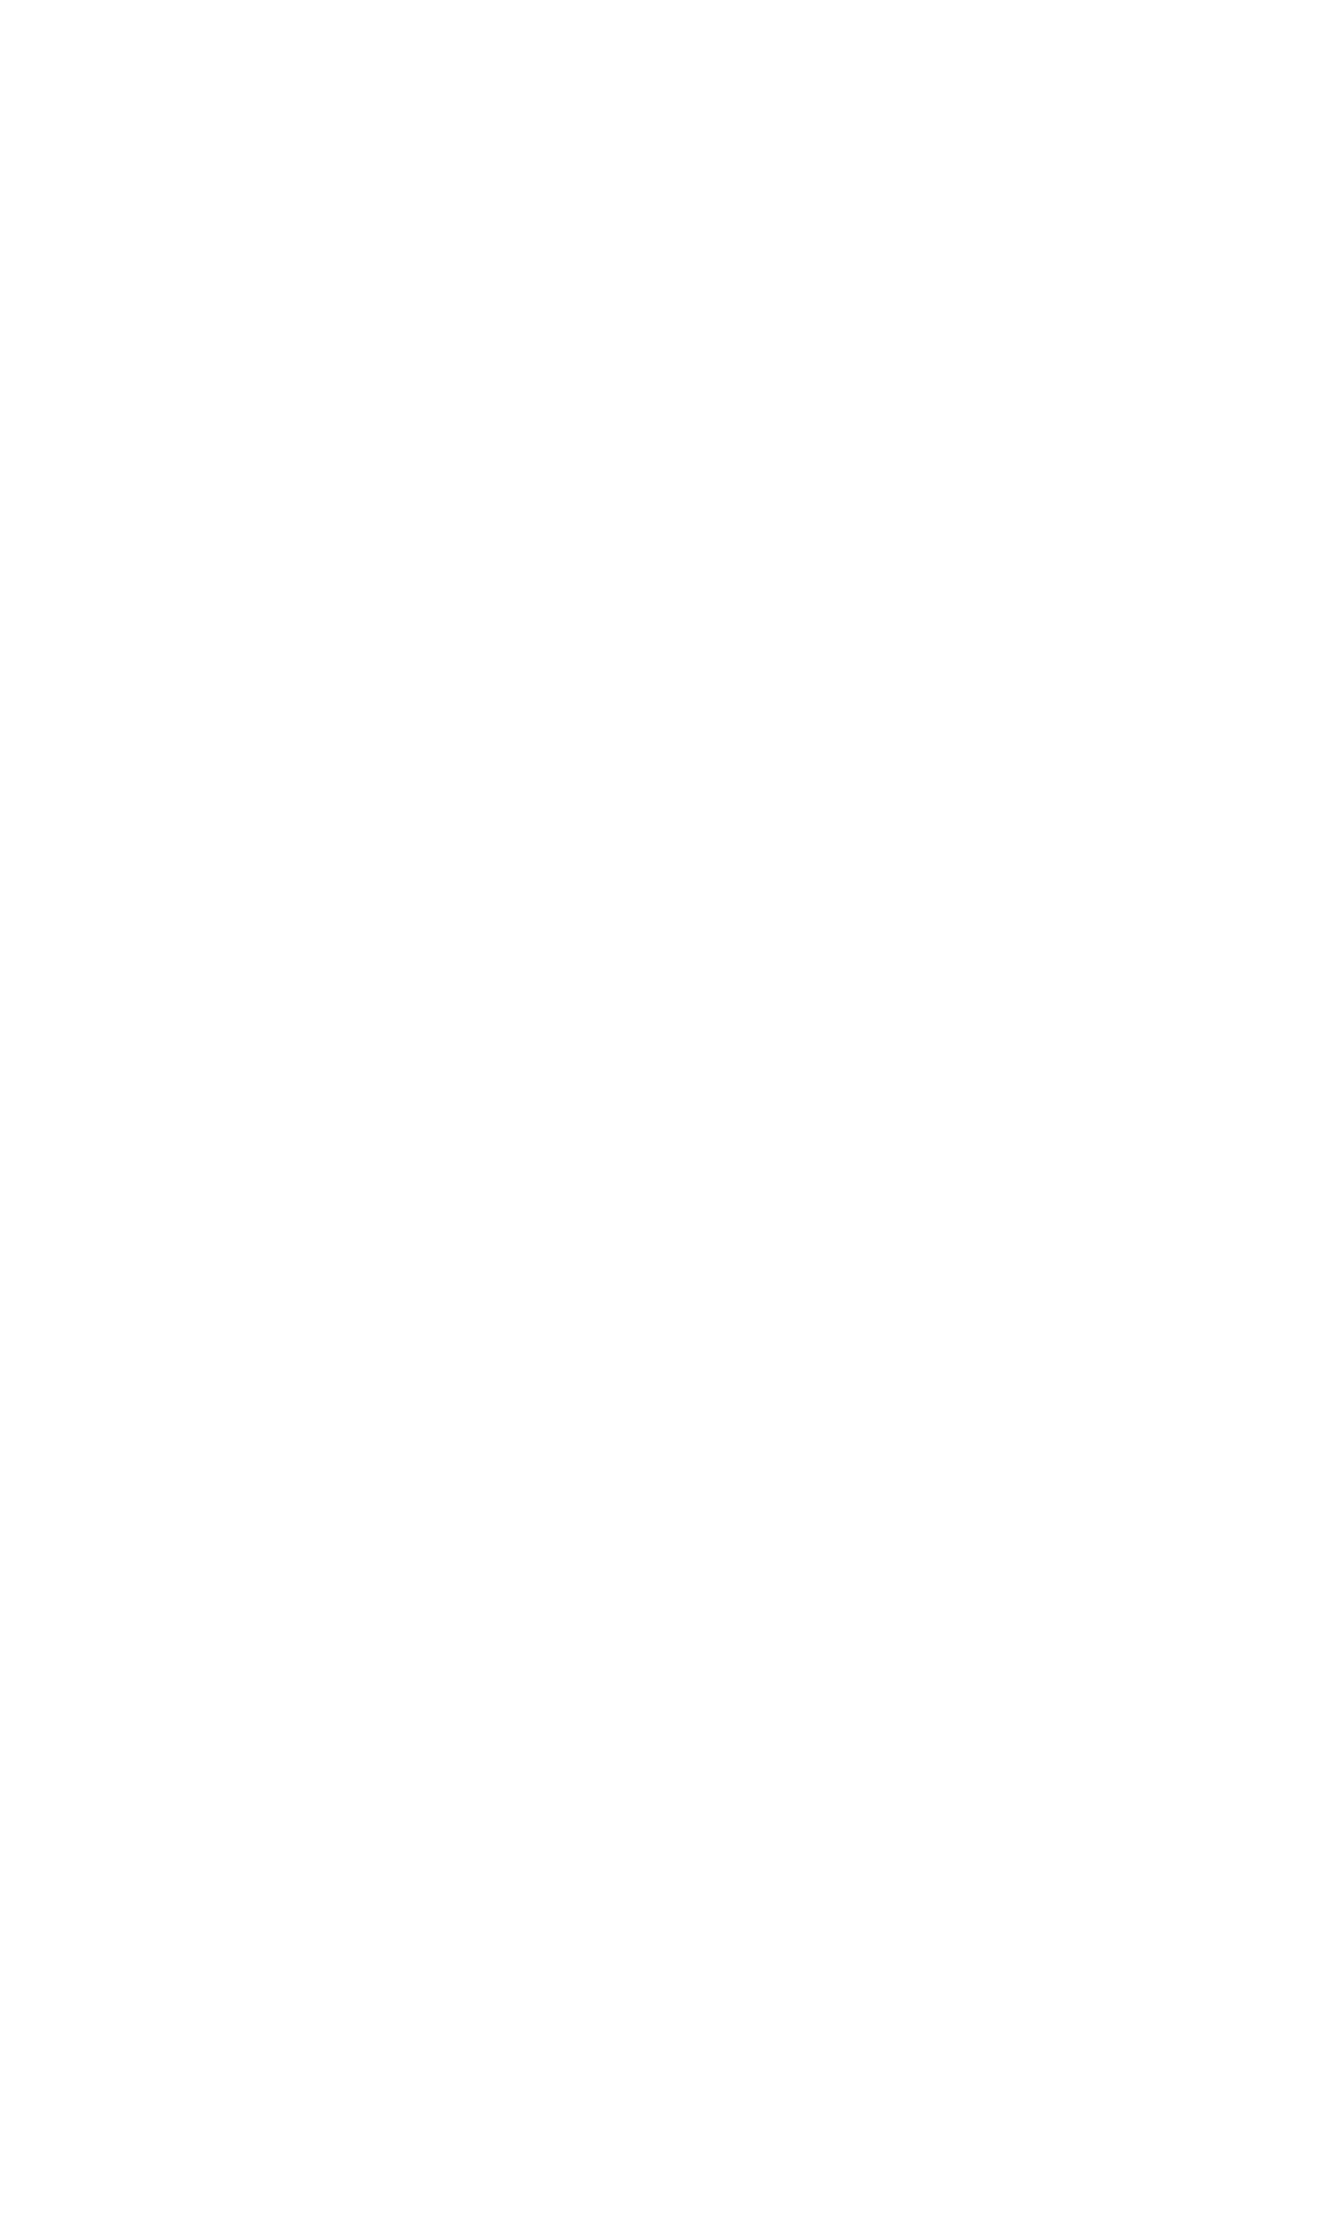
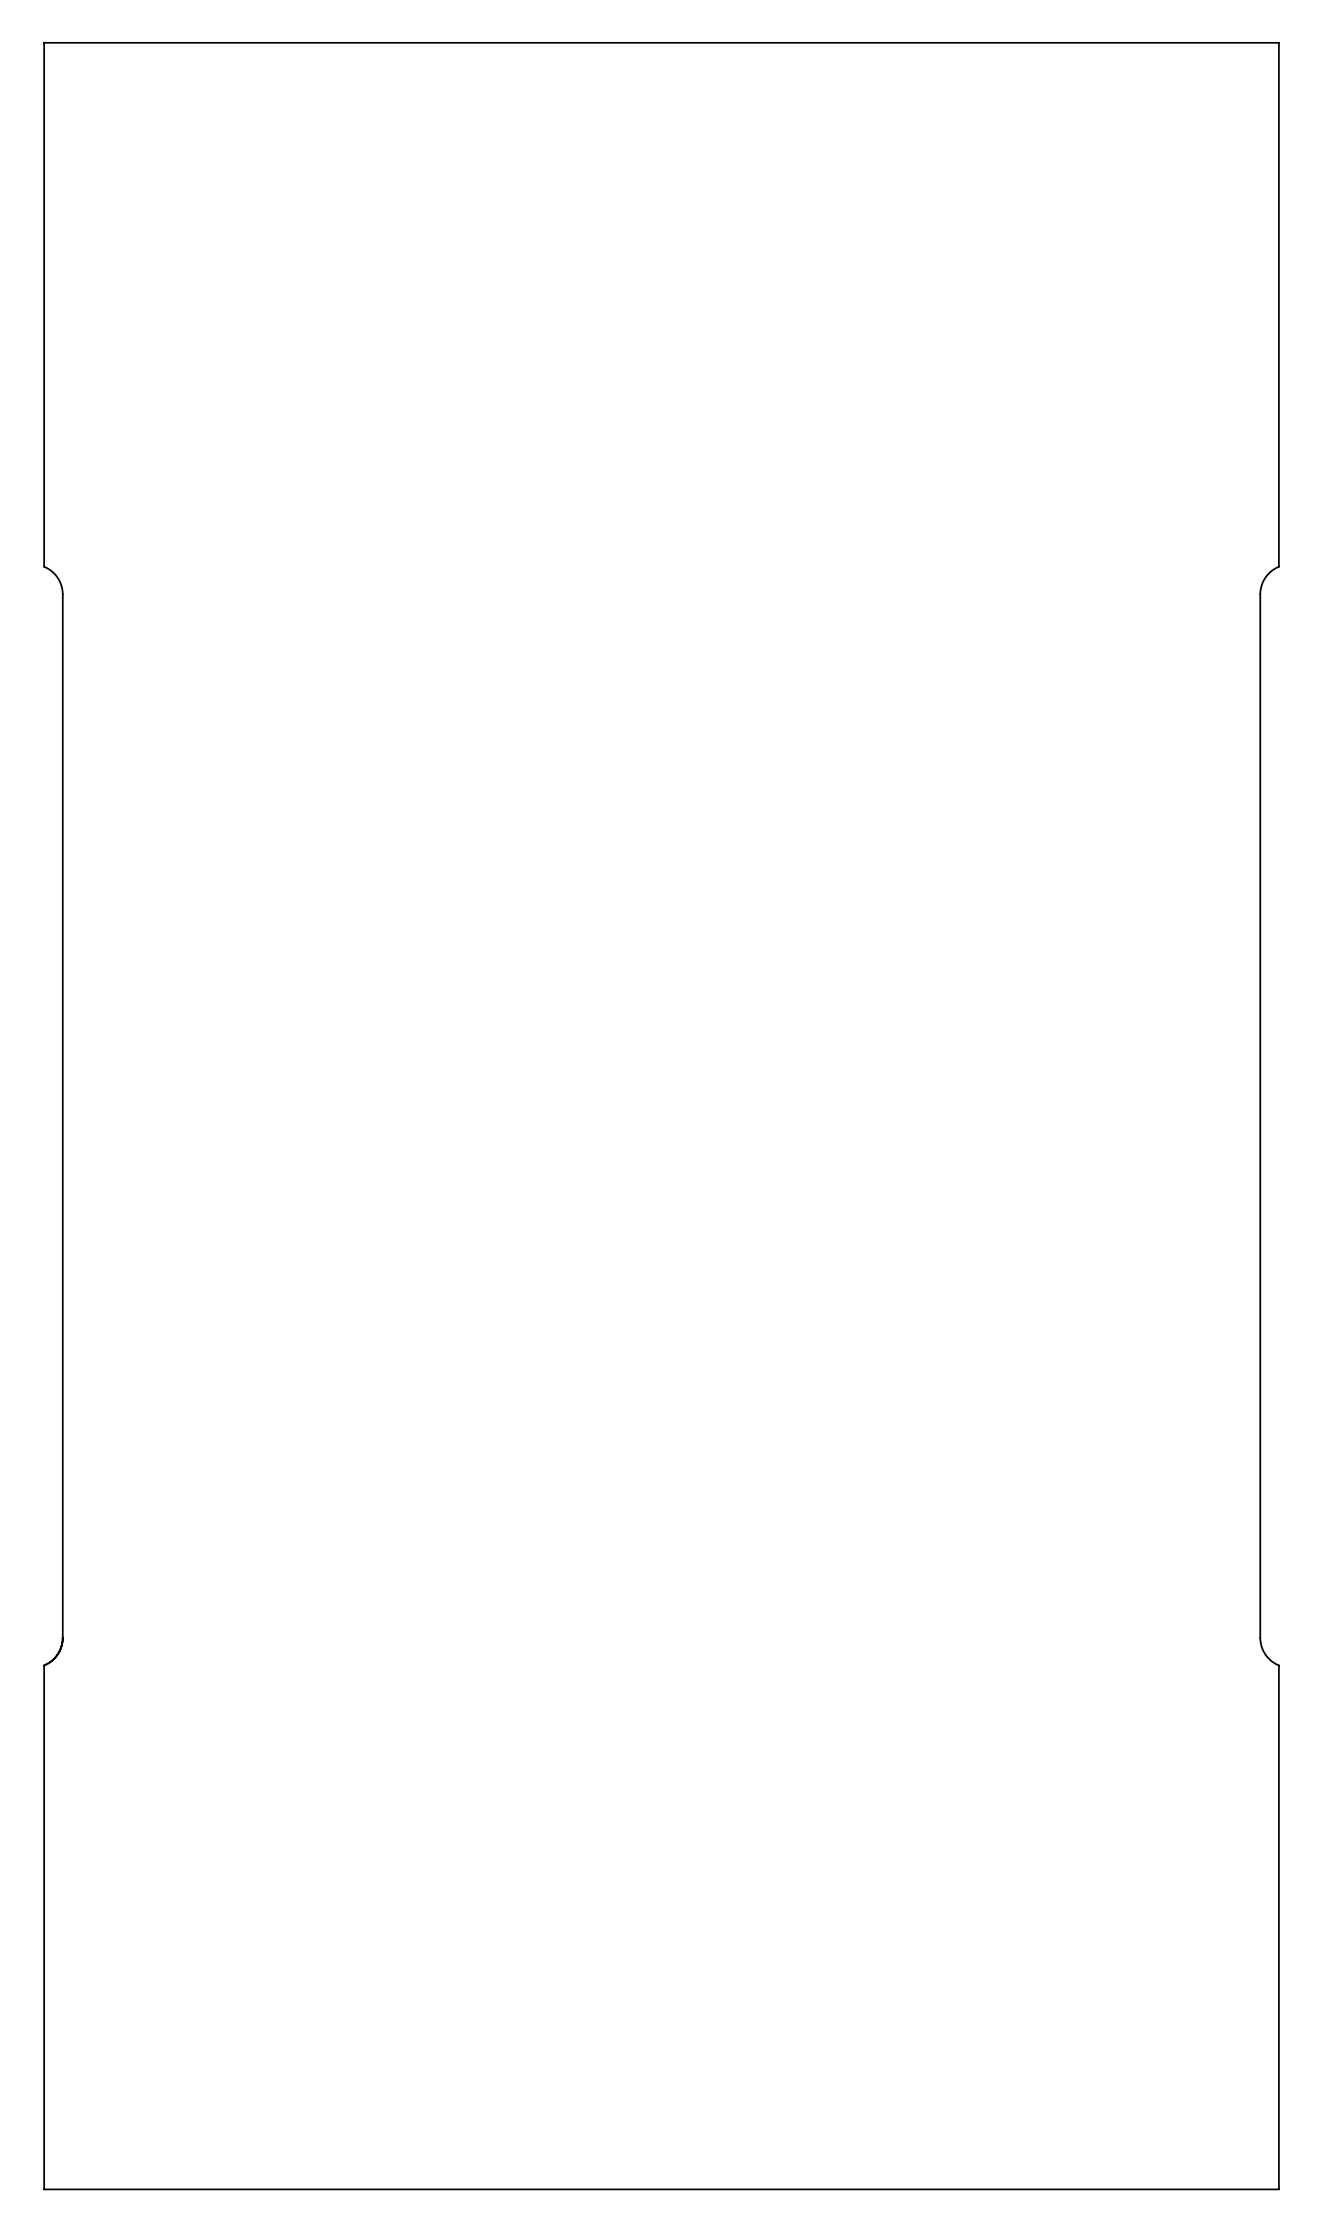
board edge: none -> (62, 1637) (62, 594) (57, 577) (44, 566) (44, 42) (1278, 42) (1278, 566) (1265, 577) (1260, 594) (1260, 1637) (1265, 1654) (1278, 1665) (1278, 2189) (44, 2189) (44, 1665)
board edge: none -> (62, 1637) (57, 1654) (44, 1665)
board edge: none -> (62, 1637) (57, 1654) (44, 1665)

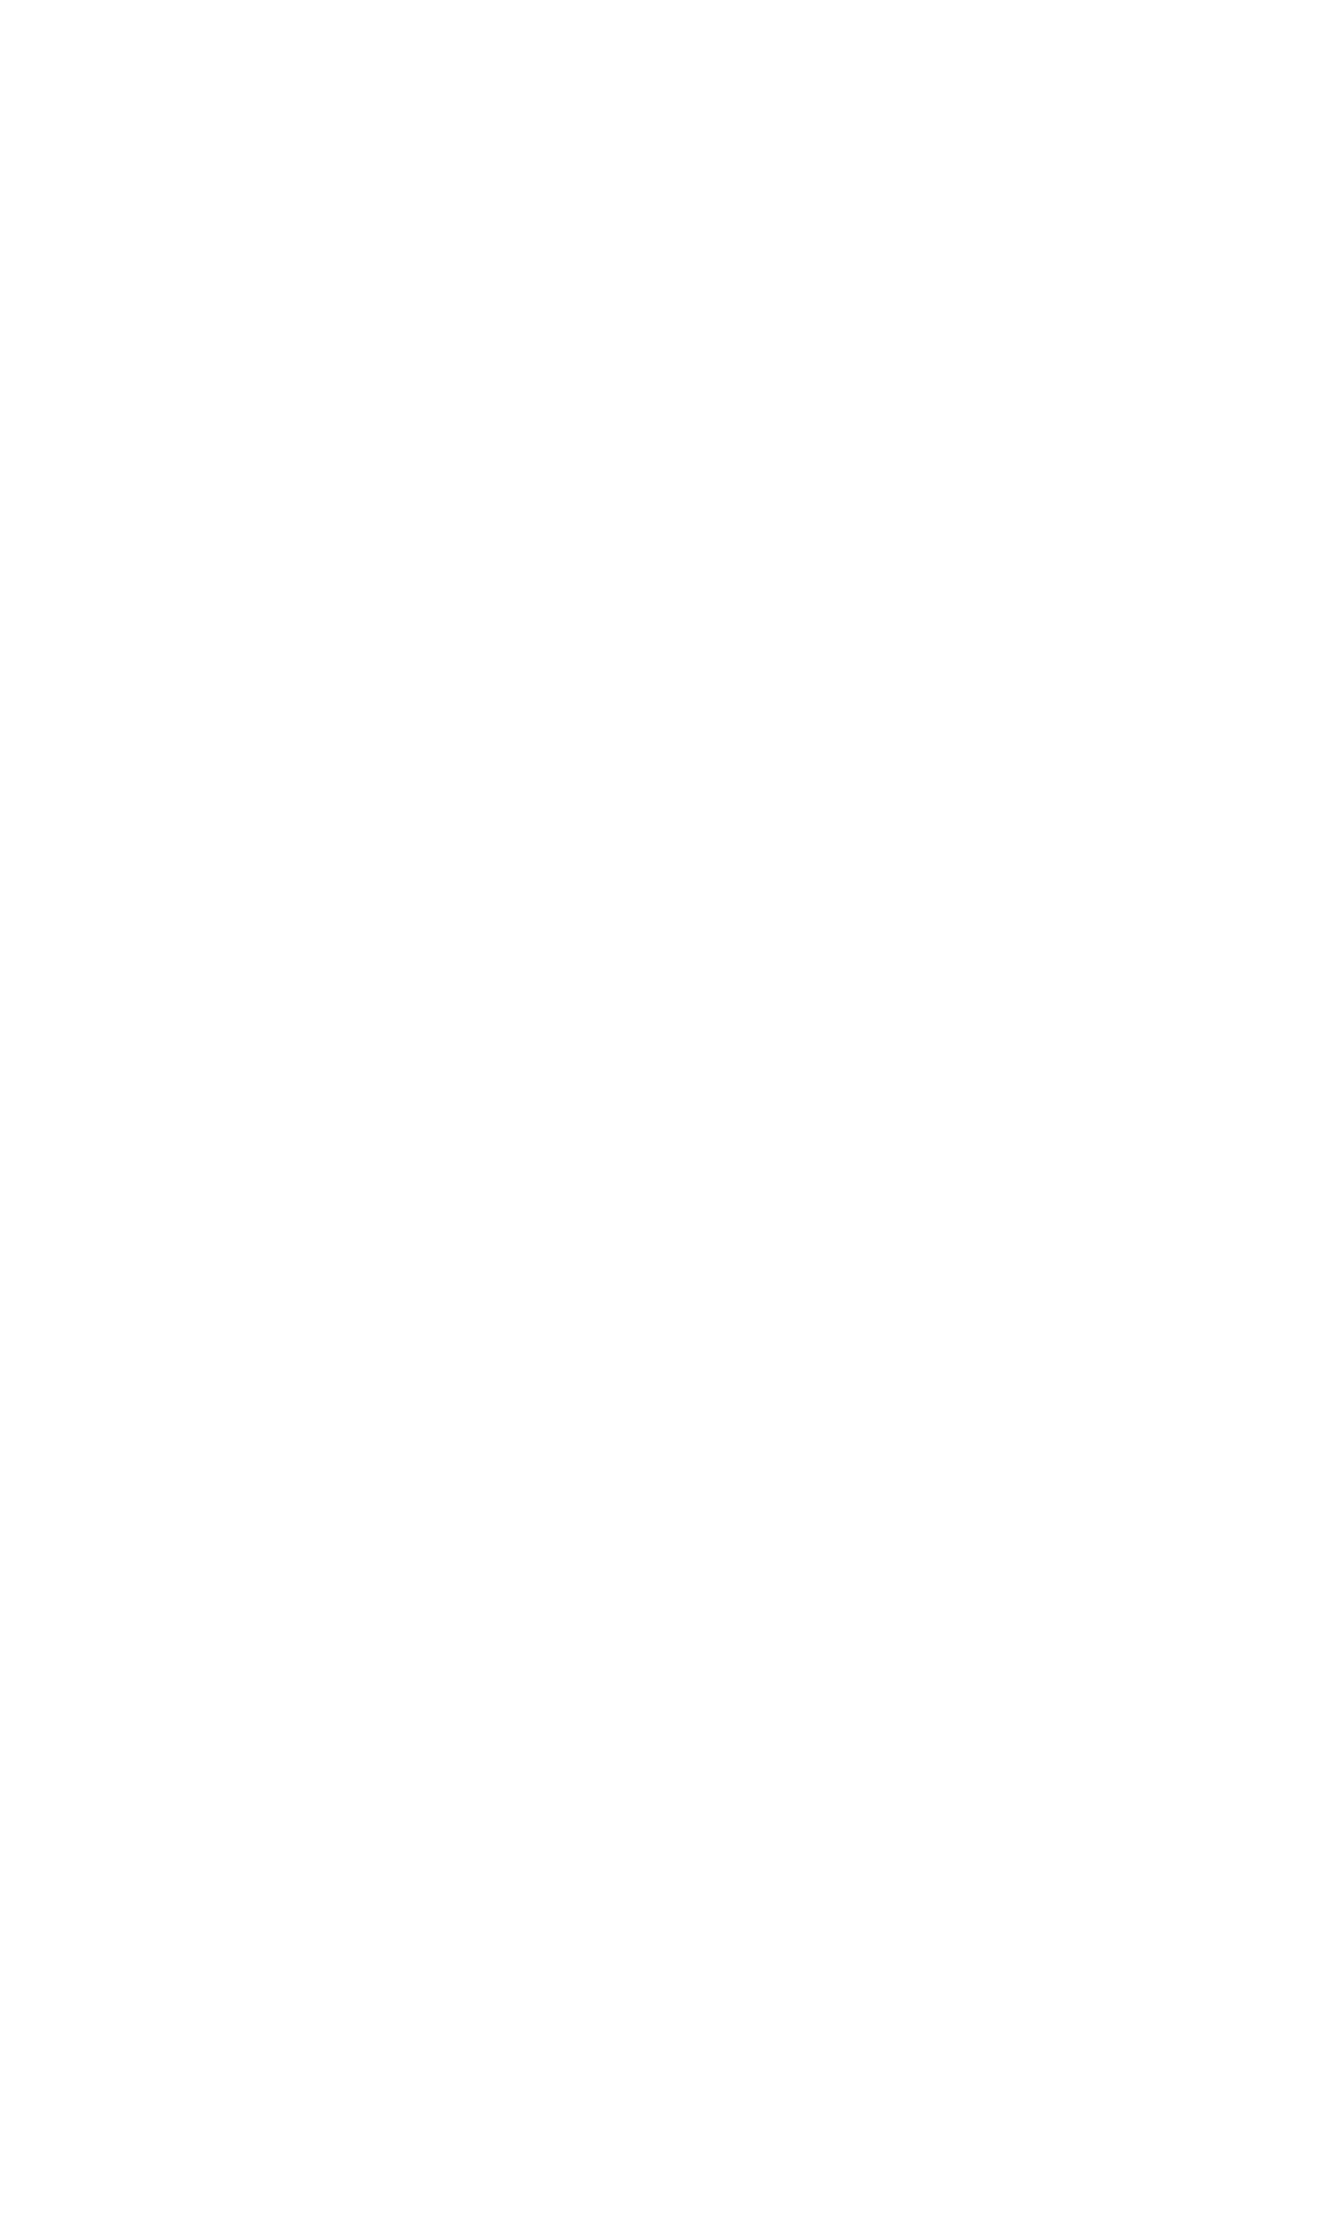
board edge: (62, 1637) (62, 594) (57, 577) (44, 566) (44, 42) (1278, 42) (1278, 566) (1265, 577) (1260, 594) (1260, 1637) (1265, 1654) (1278, 1665) (1278, 2189) (44, 2189) (44, 1665) -> none
board edge: (62, 1637) (57, 1654) (44, 1665) -> none
board edge: (62, 1637) (57, 1654) (44, 1665) -> none

